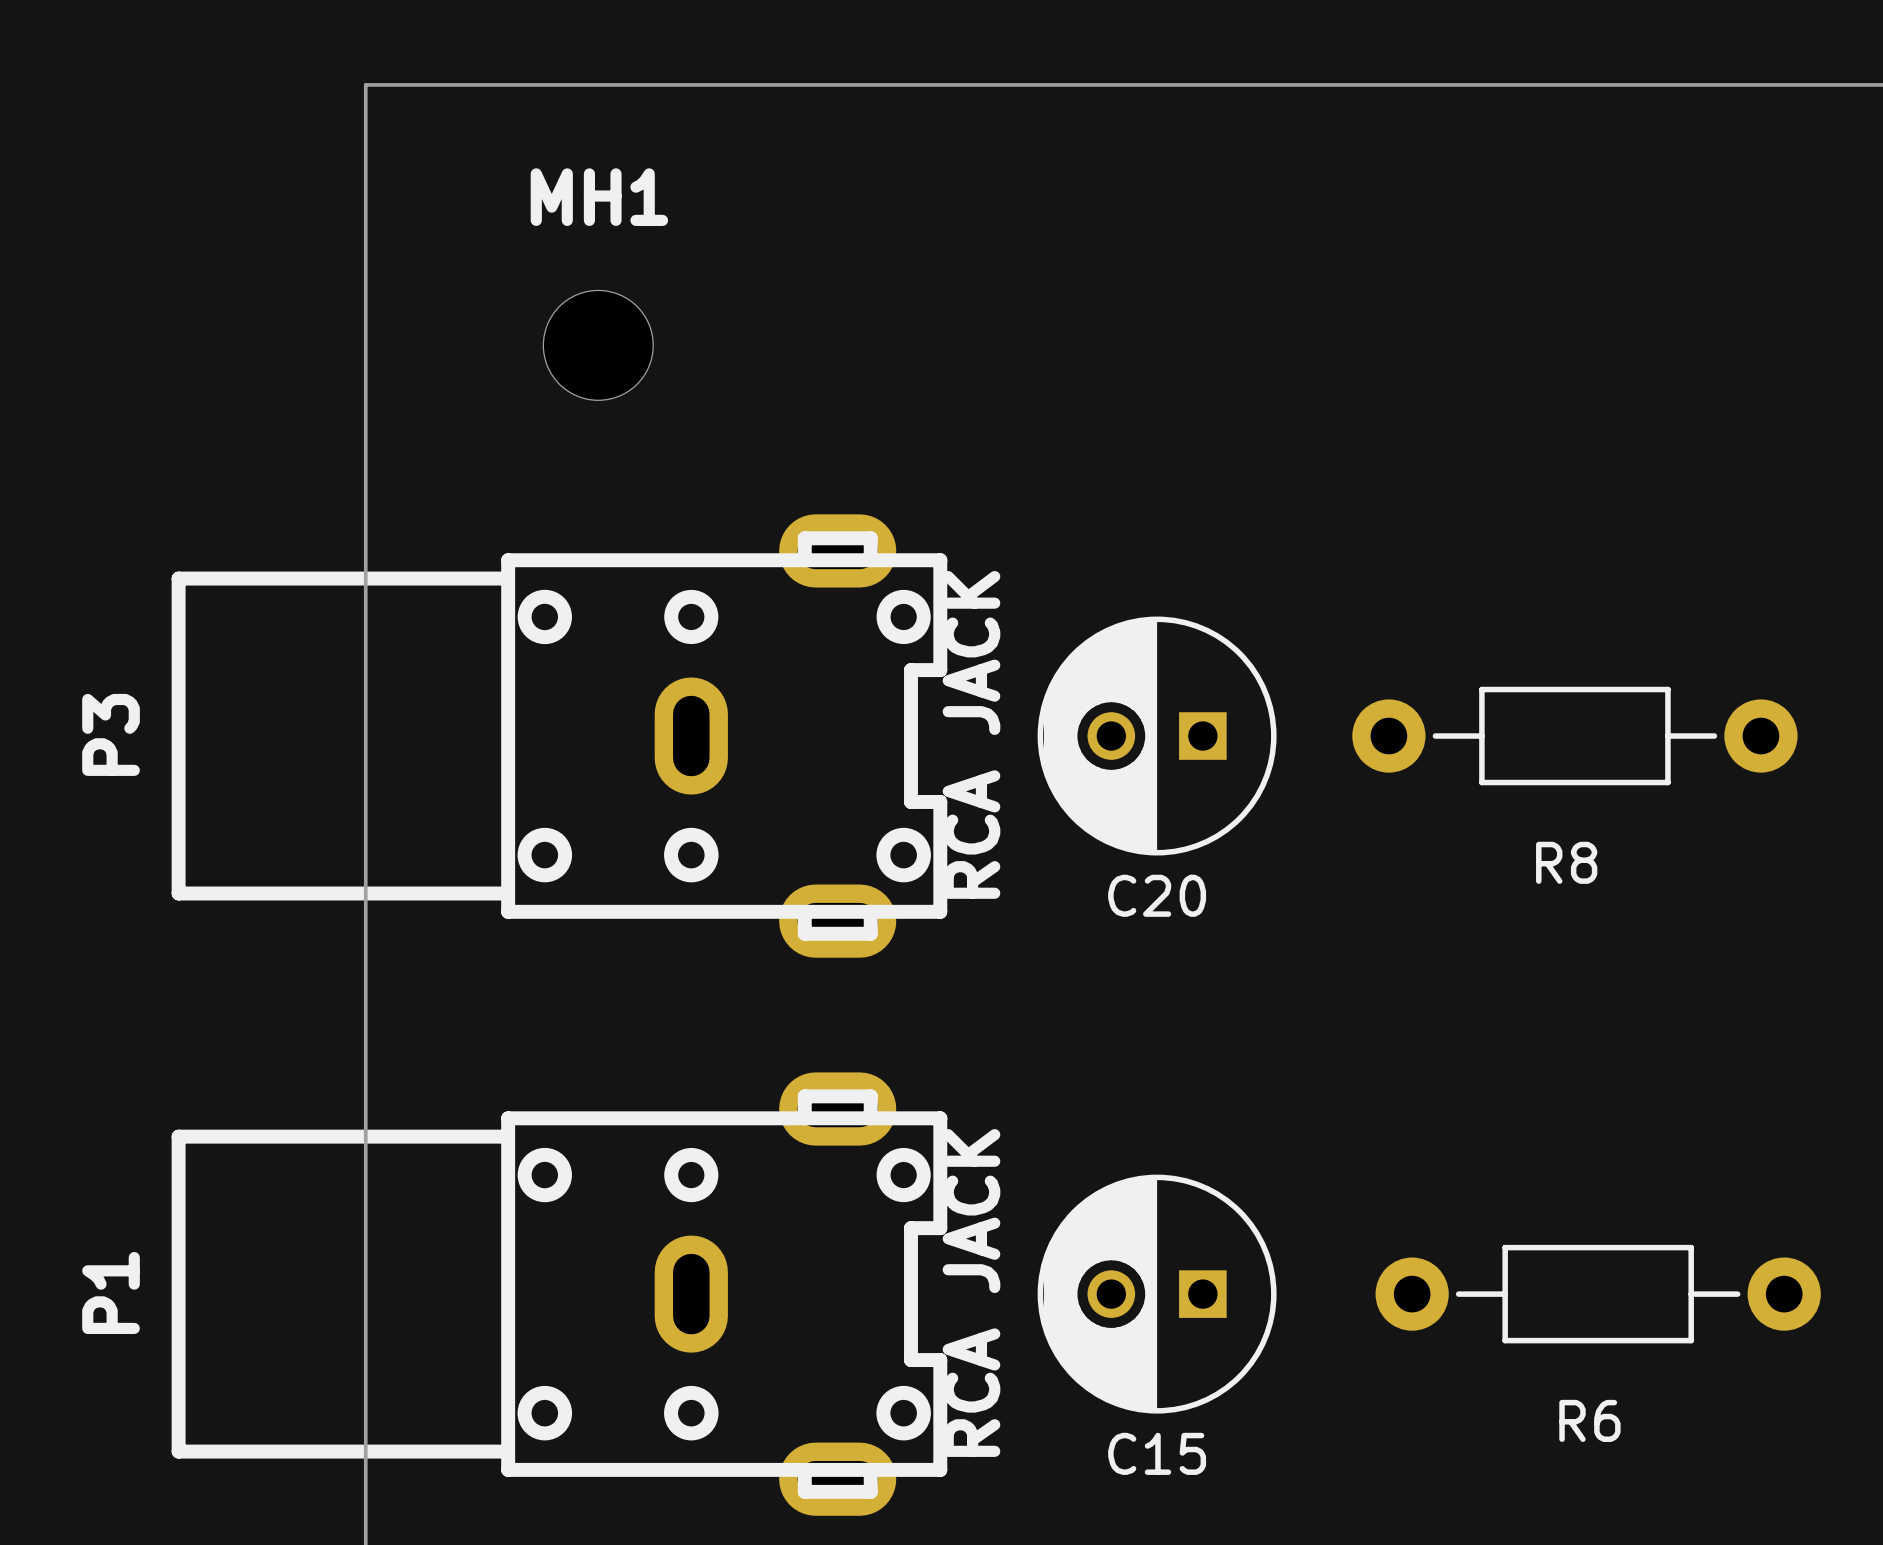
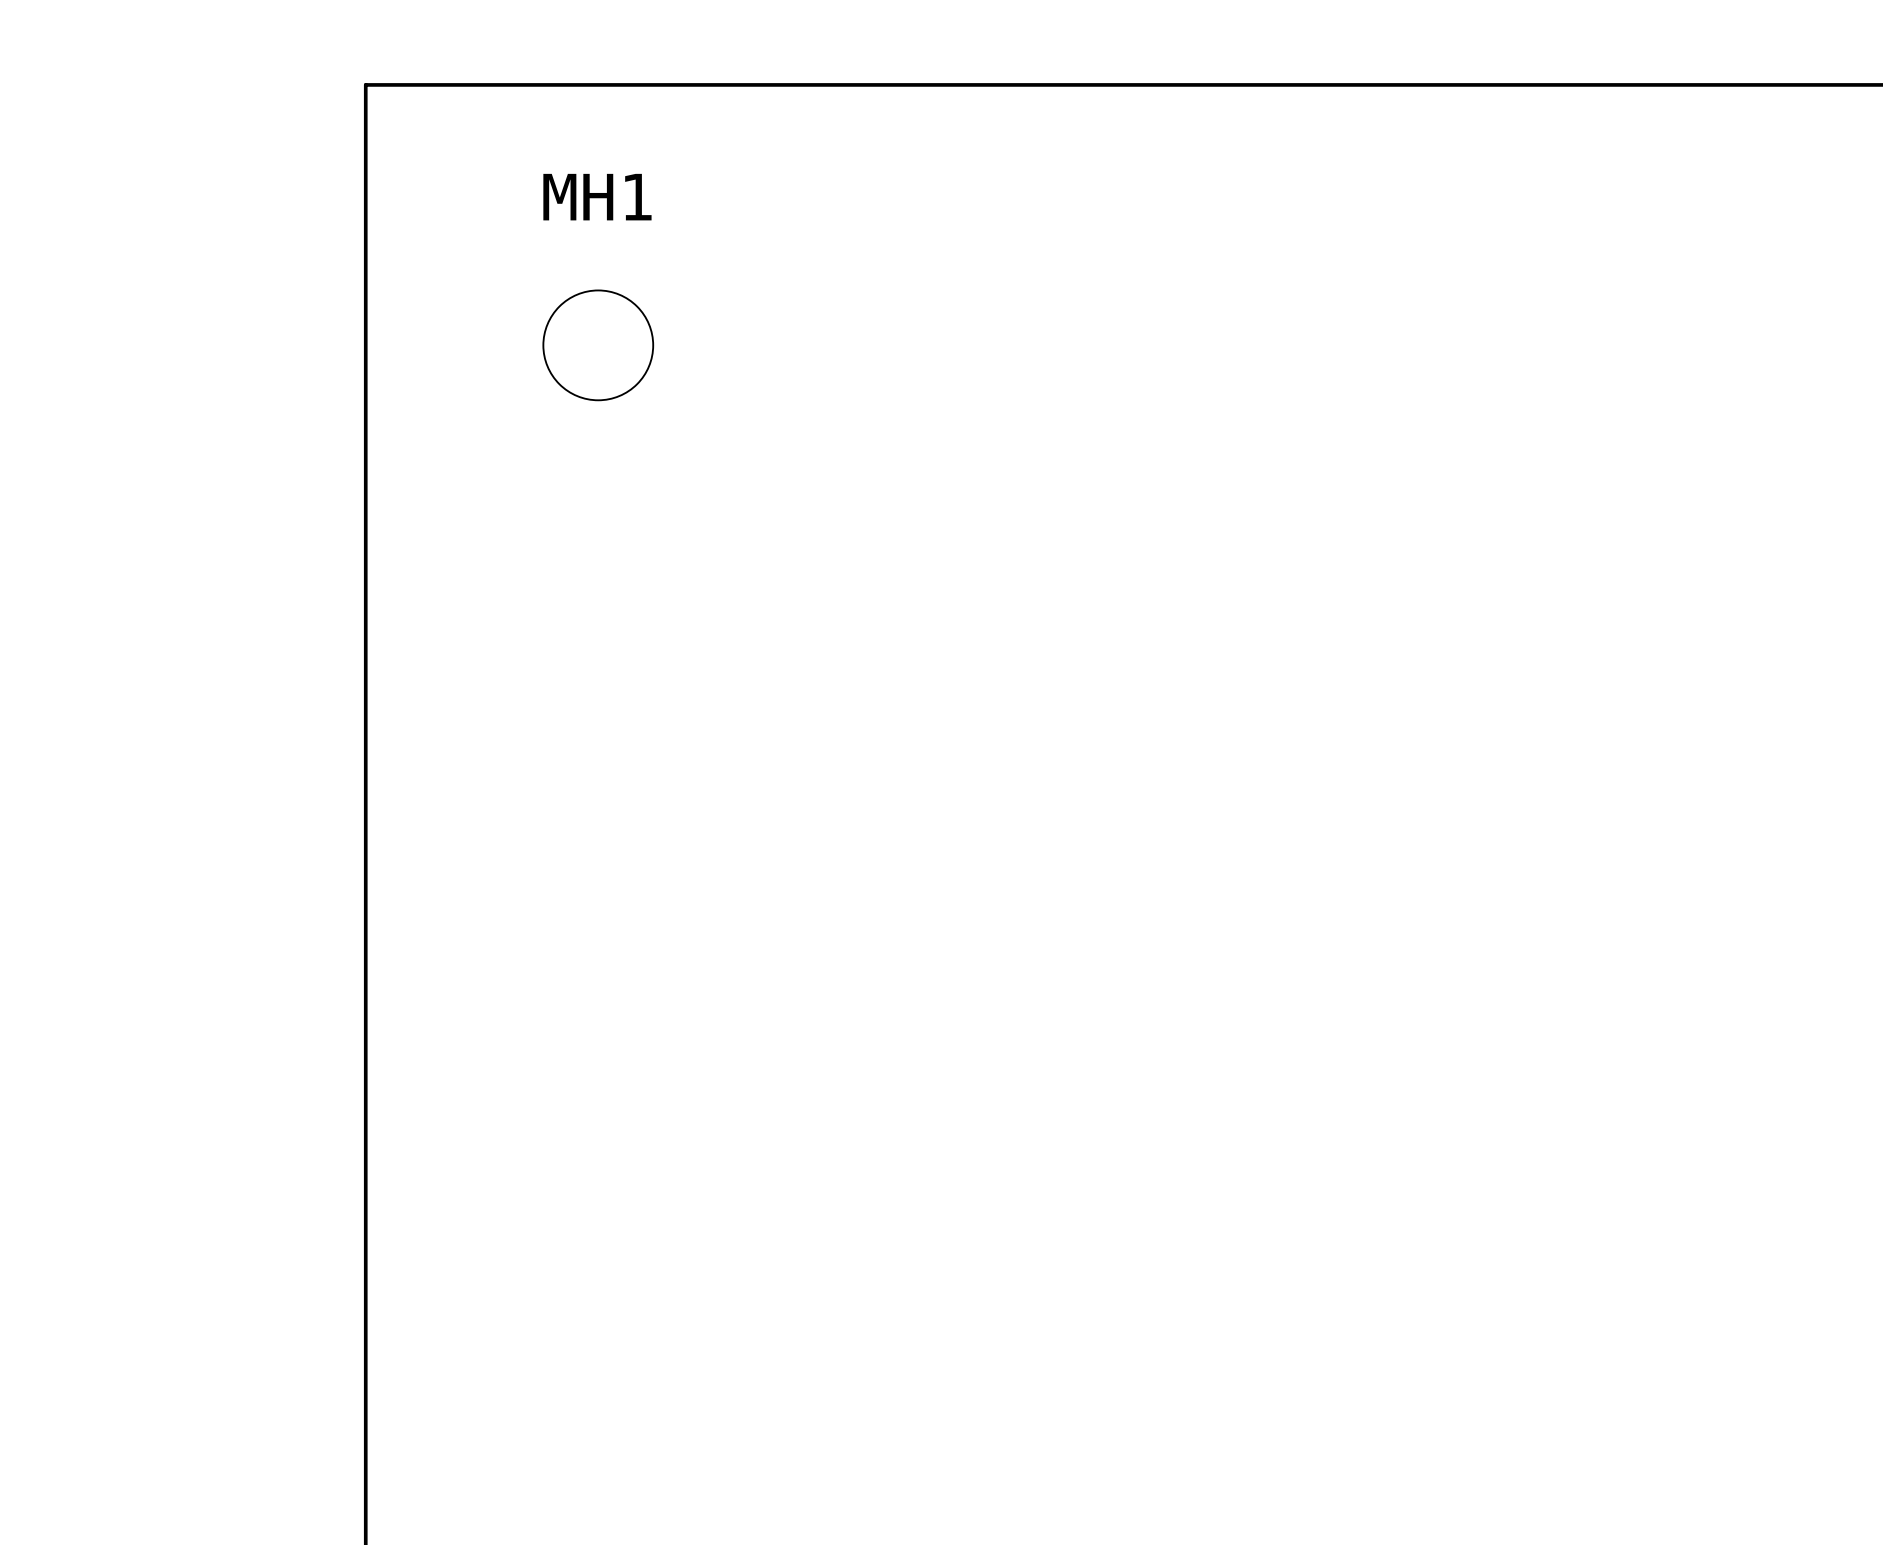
P3: RCA JACK (559, 736) -> none
C20: (1157, 736) -> none
R8: (1574, 736) -> none
P1: RCA JACK (559, 1294) -> none
C15: (1157, 1294) -> none
R6: (1598, 1294) -> none

